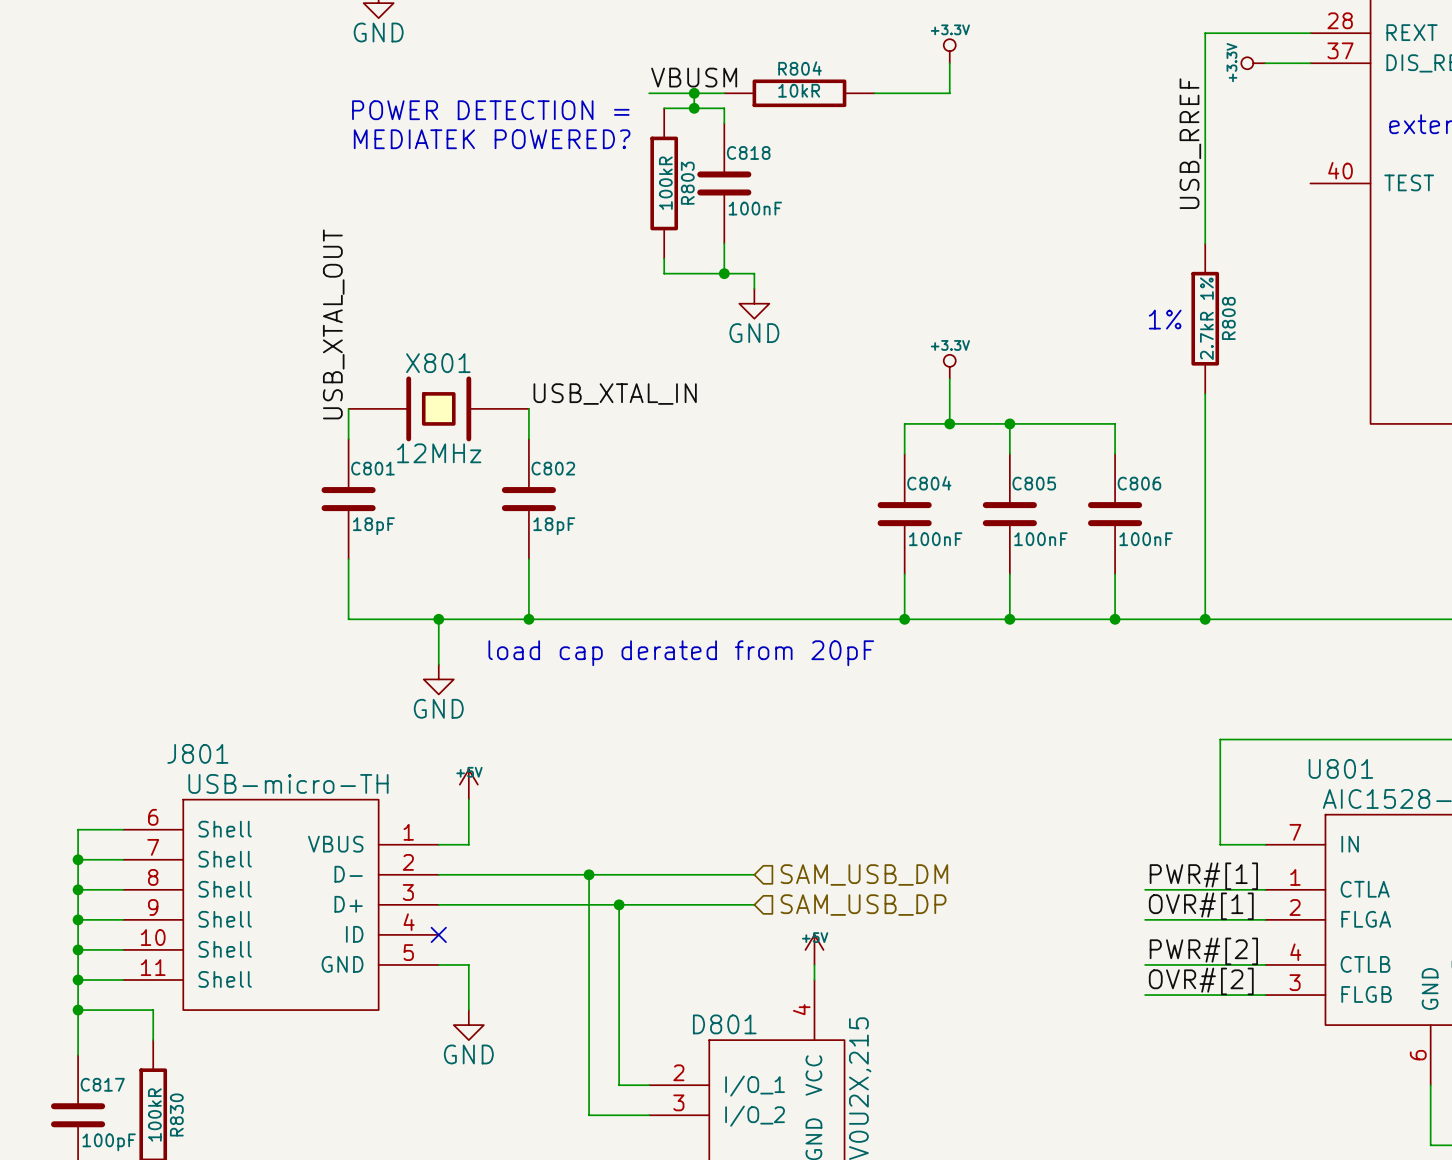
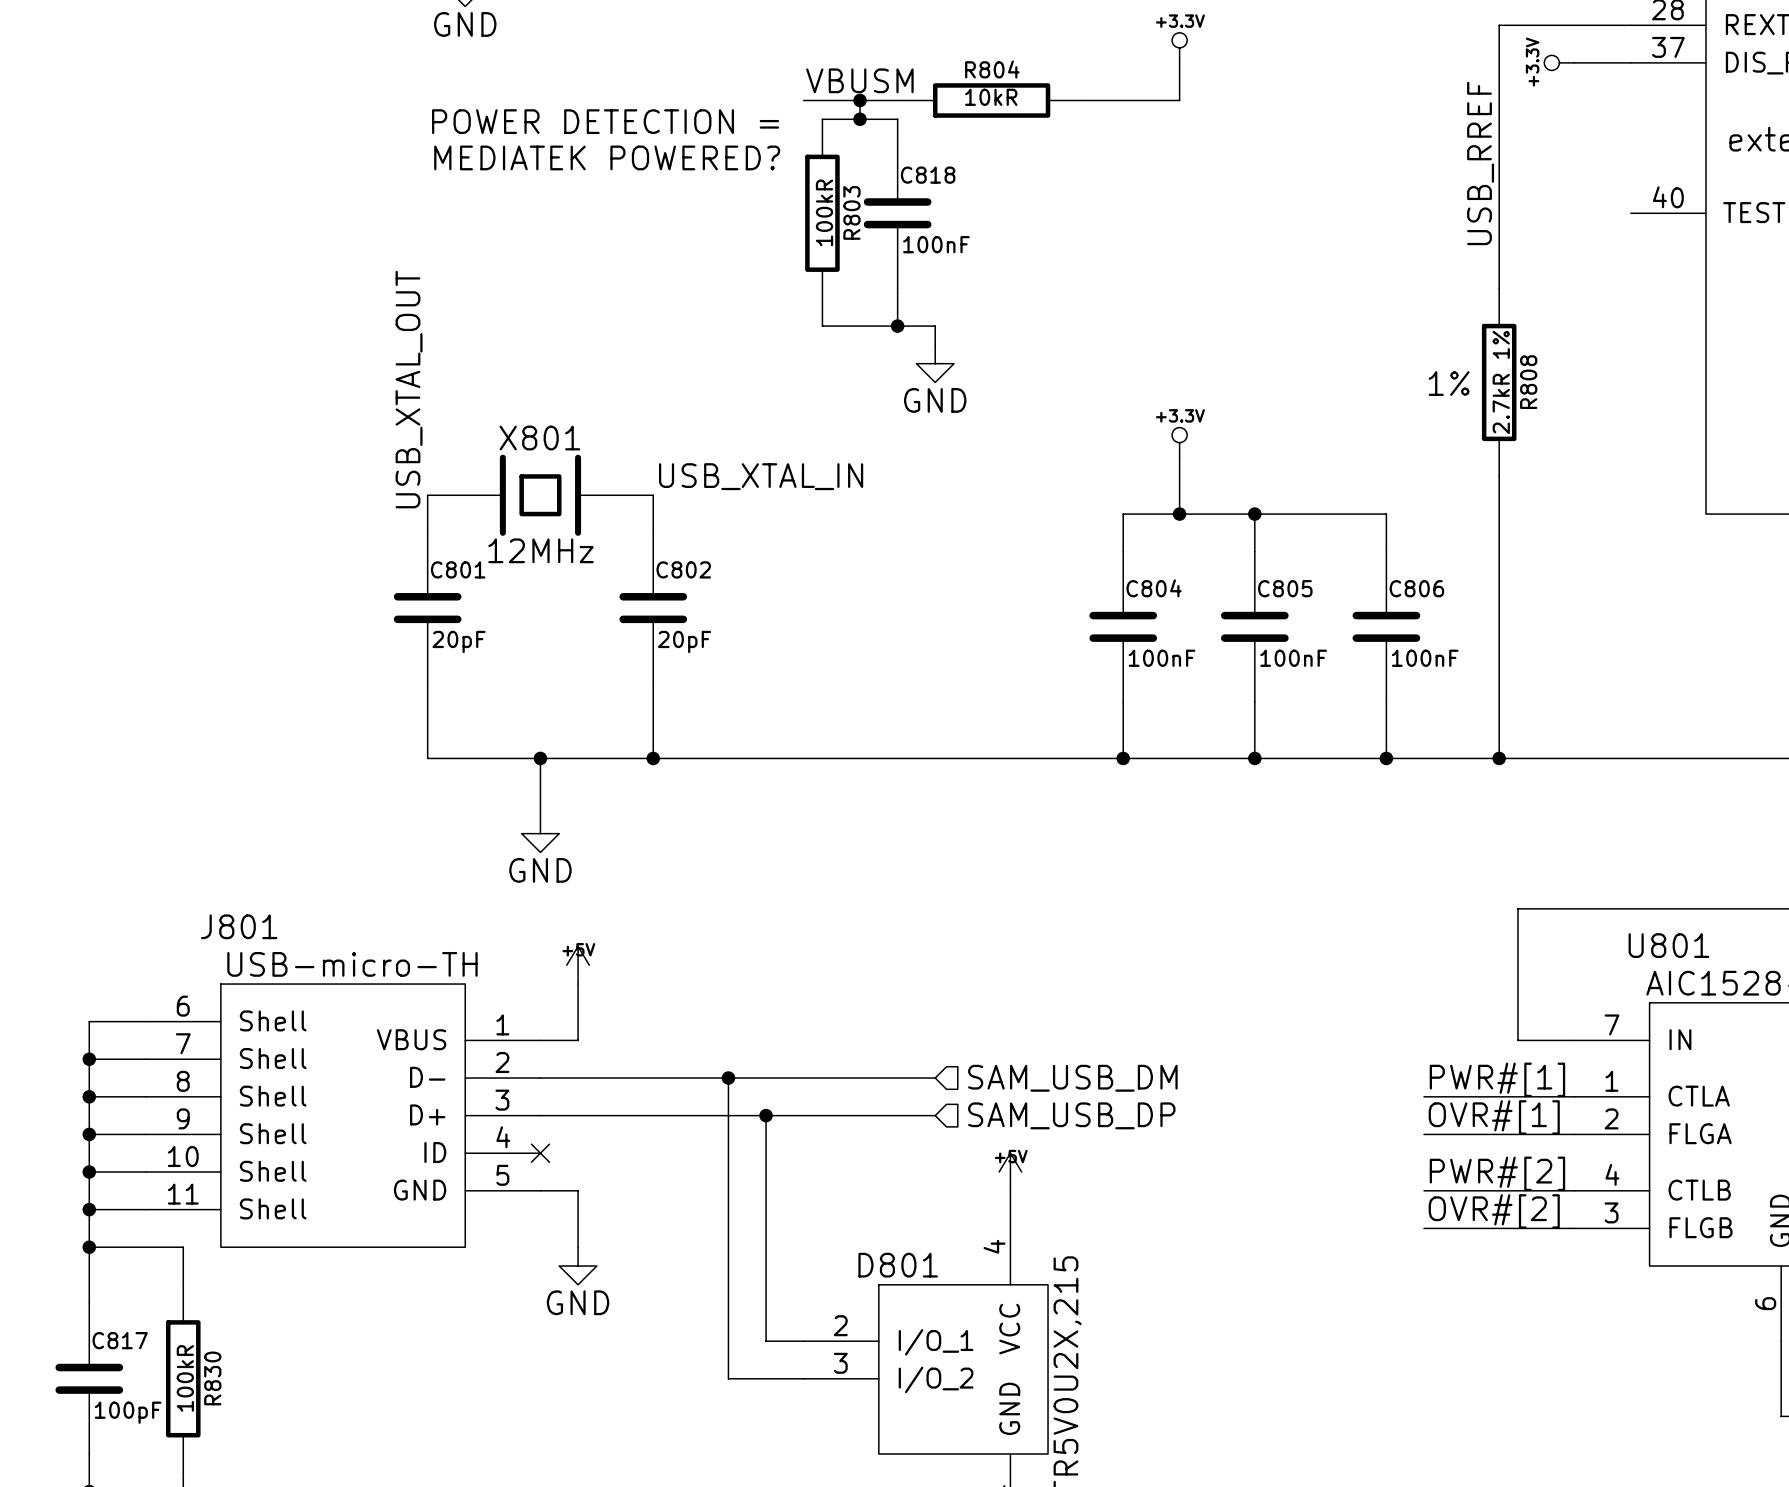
C801 value: 18pF (373, 526) -> 20pF (458, 641)
C802 value: 18pF (554, 526) -> 20pF (684, 641)
text: load cap derated from 20pF (681, 653) -> none

